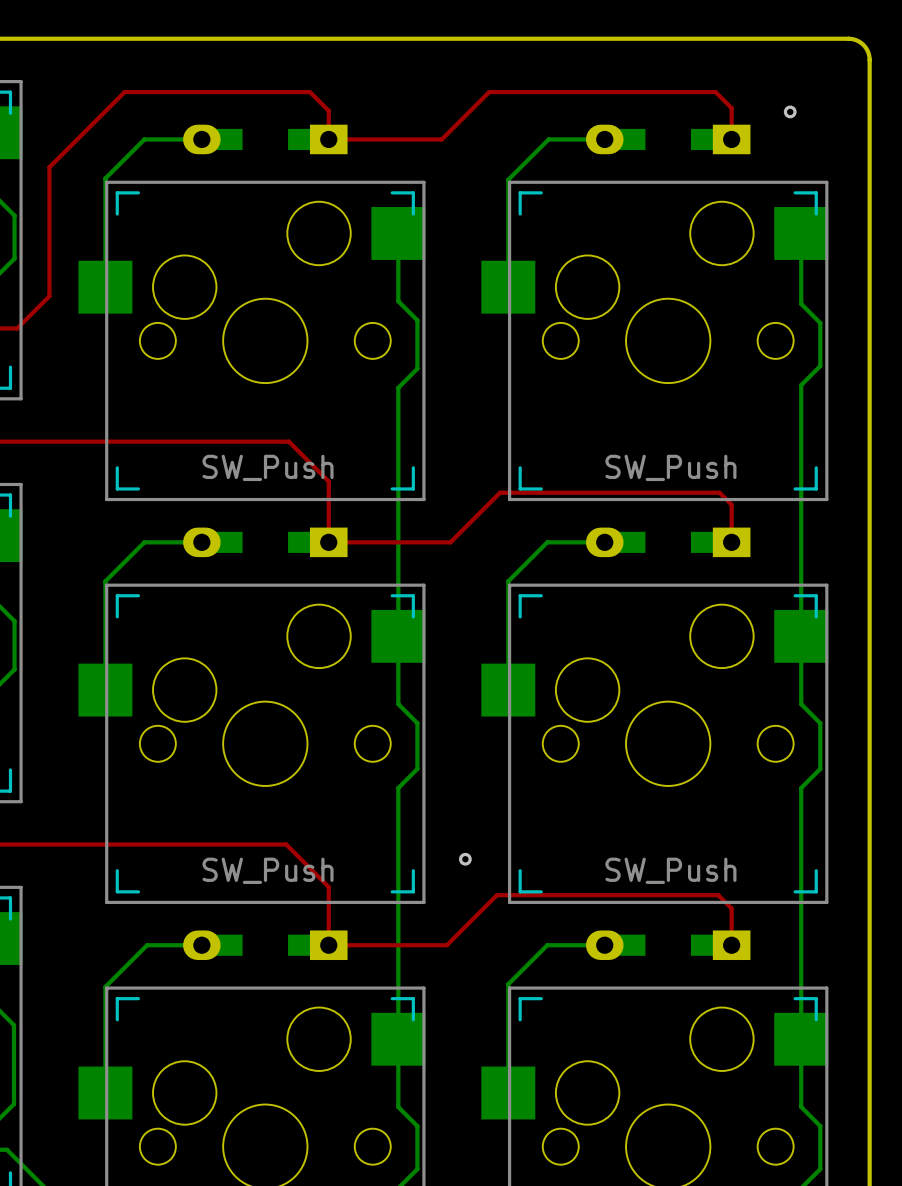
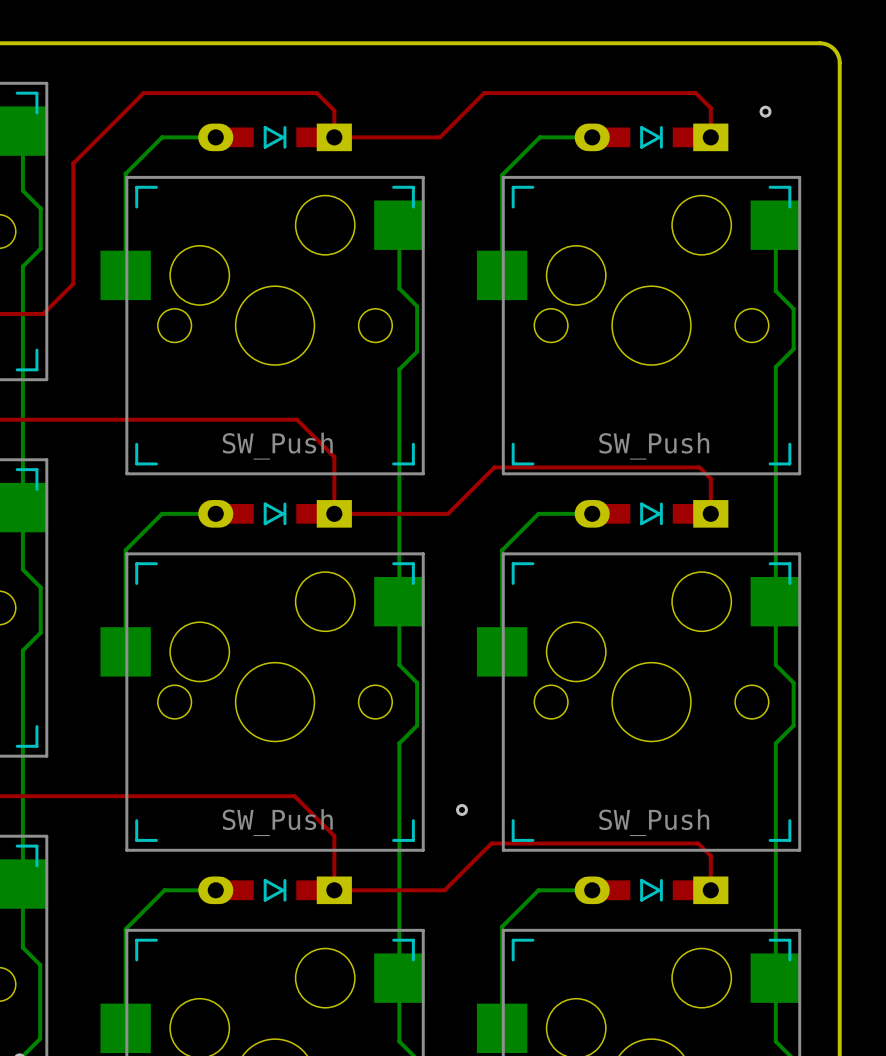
part side: bottom (265, 139) -> top (275, 137)
part side: bottom (668, 139) -> top (651, 137)
part side: bottom (265, 542) -> top (275, 513)
part side: bottom (668, 542) -> top (651, 513)
part side: bottom (265, 945) -> top (275, 890)
part side: bottom (668, 945) -> top (651, 890)

